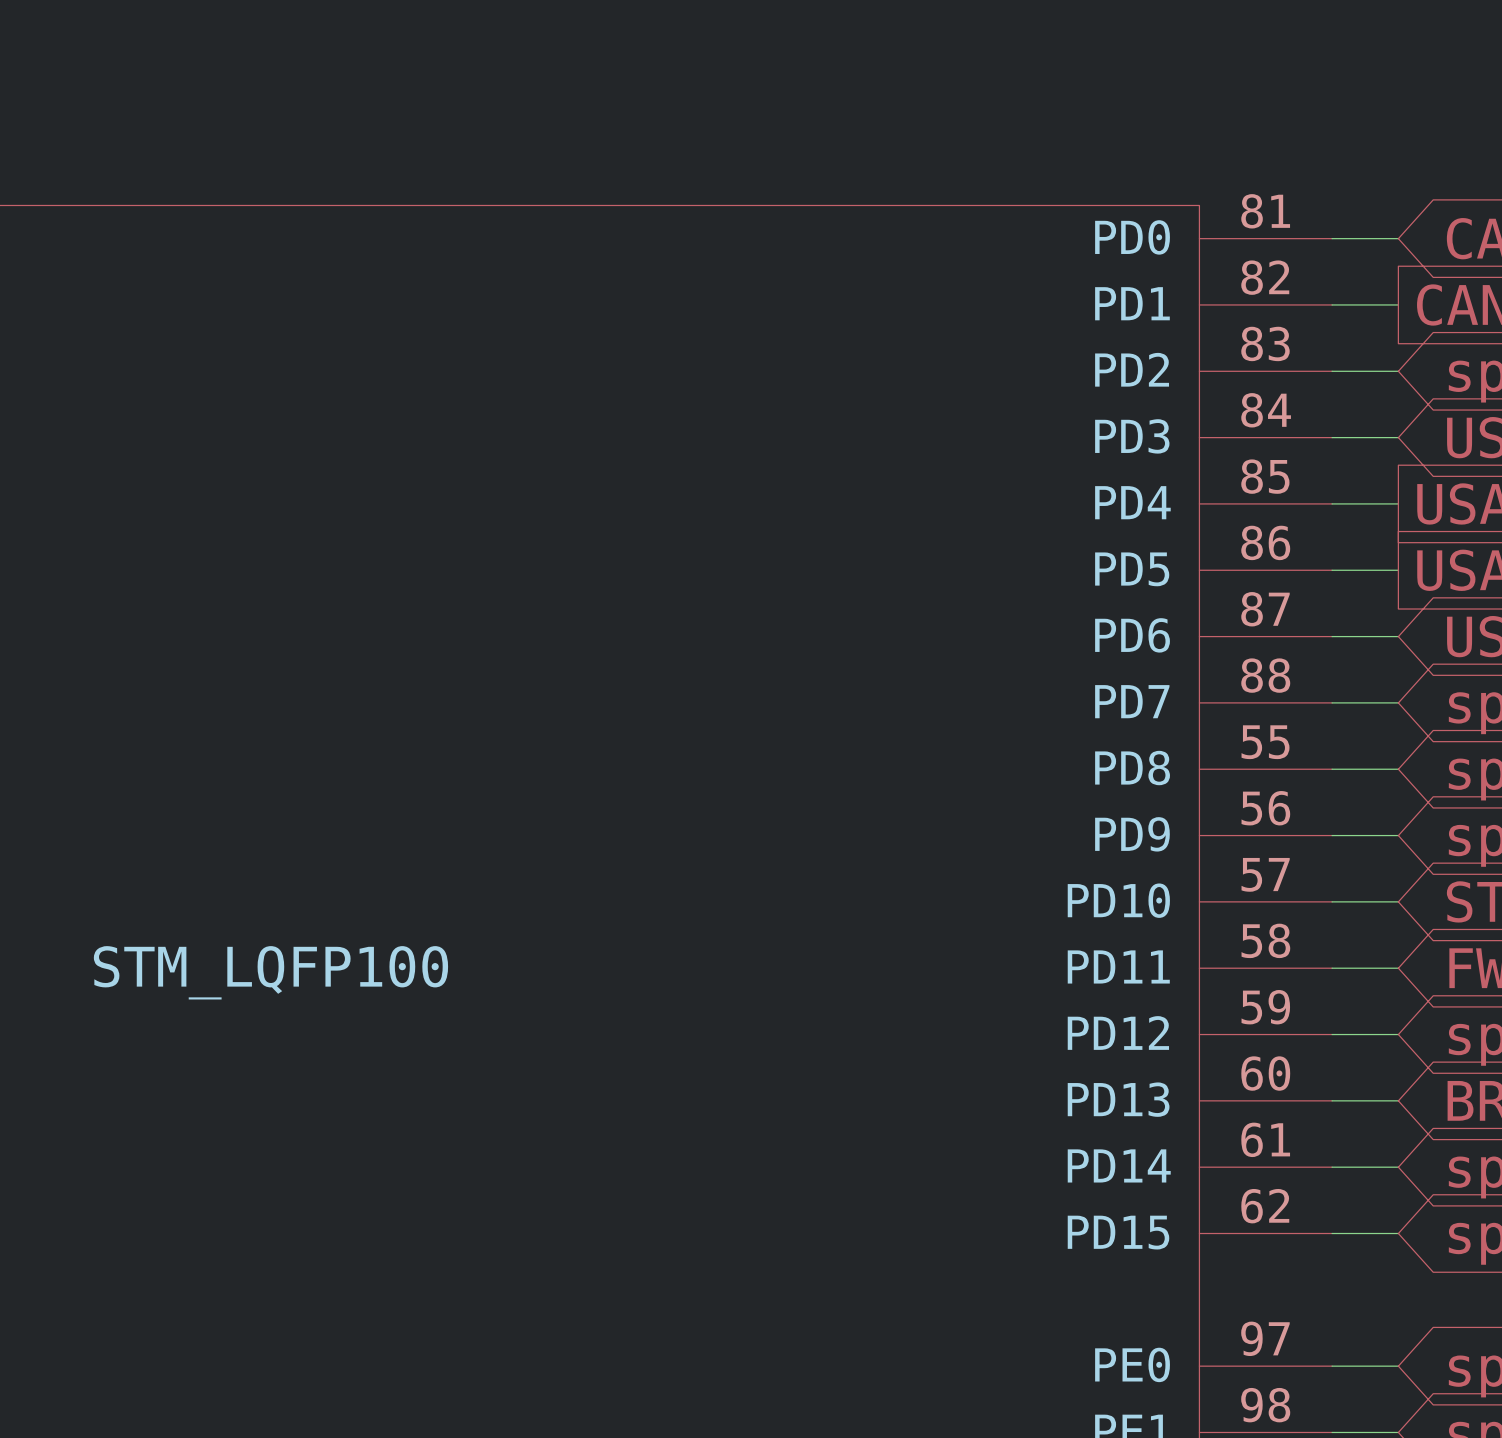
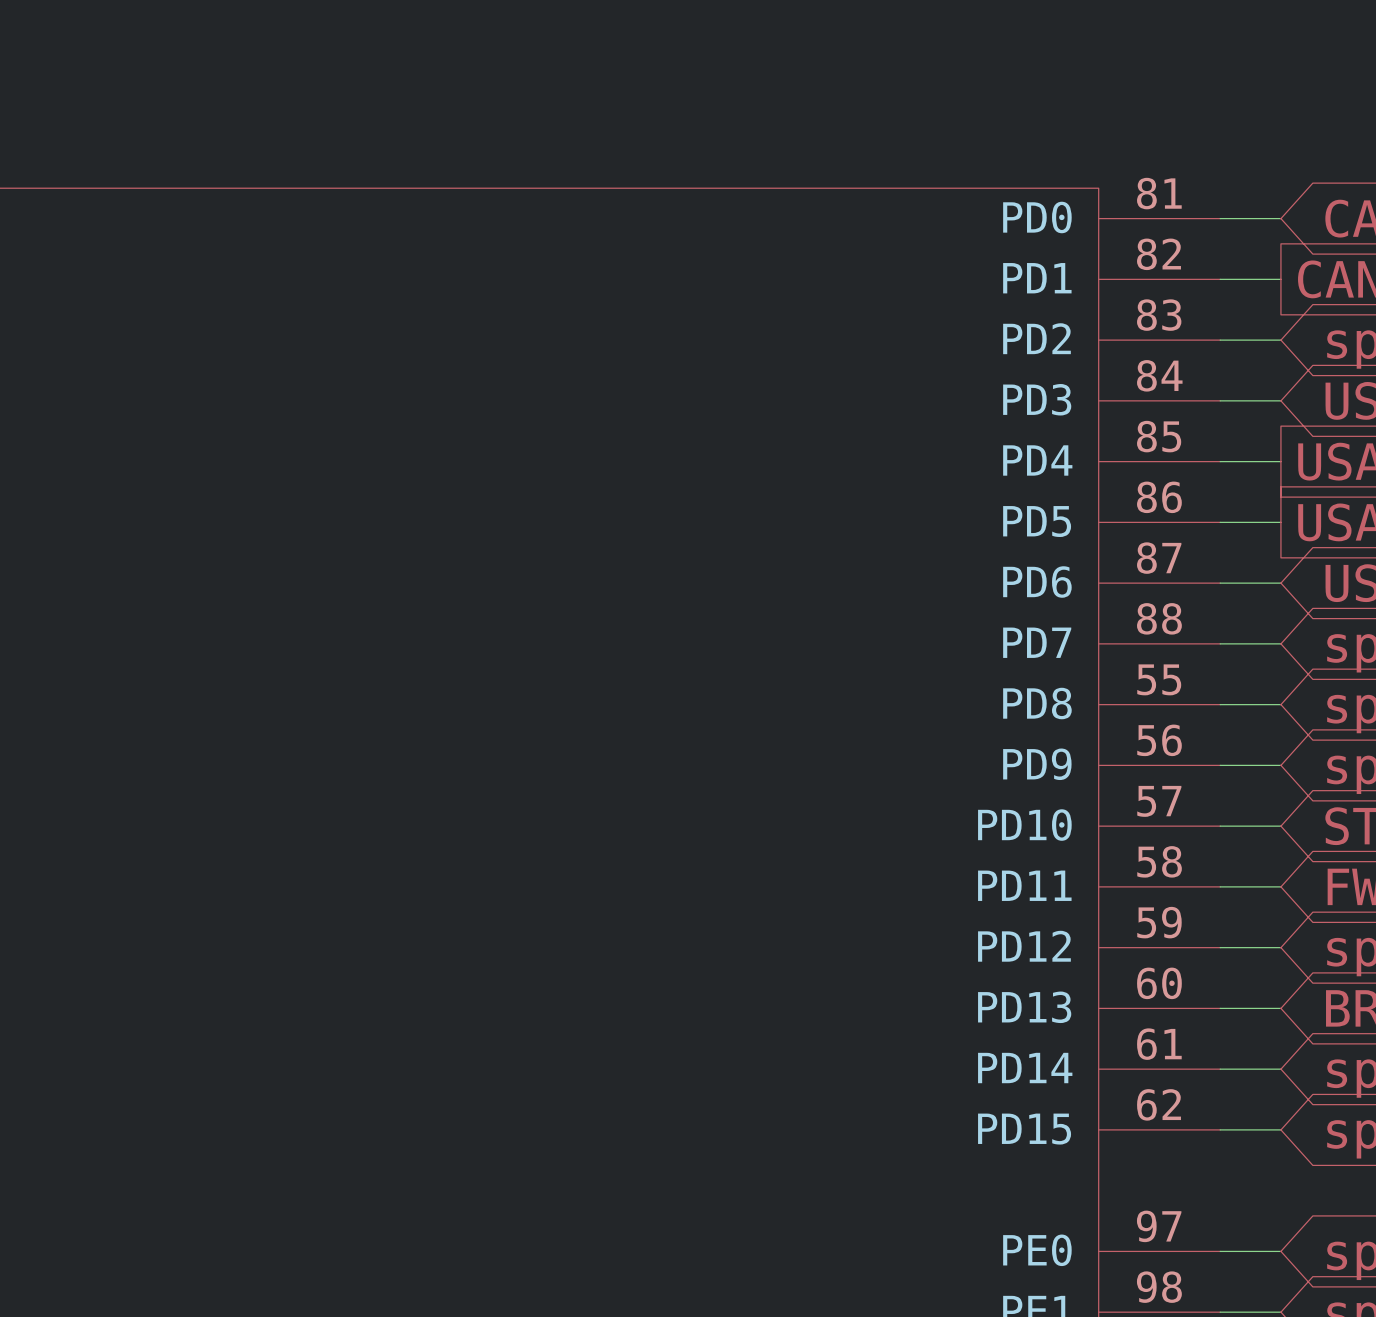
part text: STM_LQFP100 (270, 972) -> none

